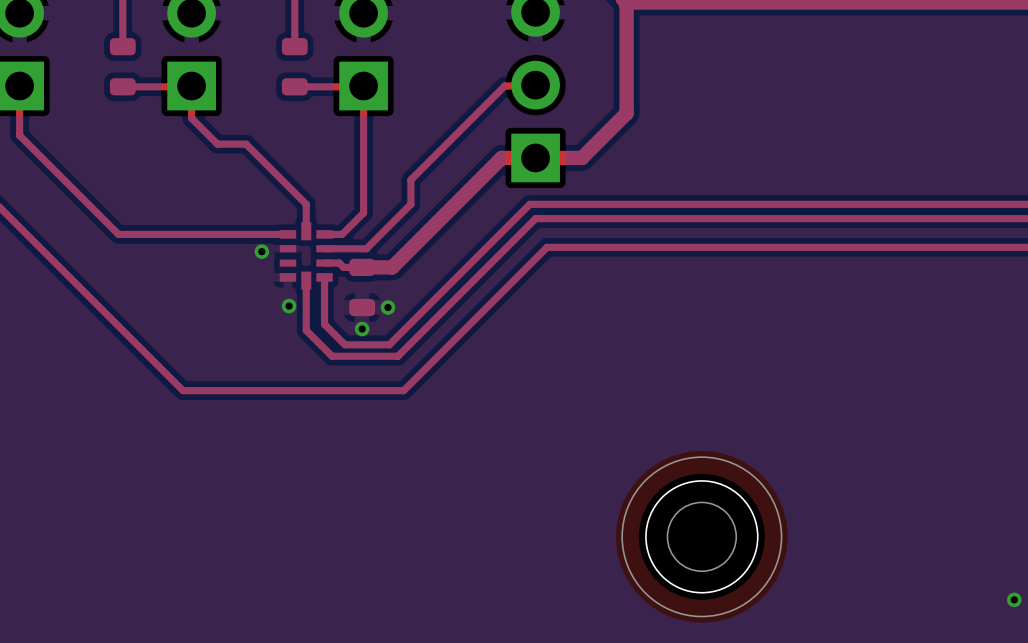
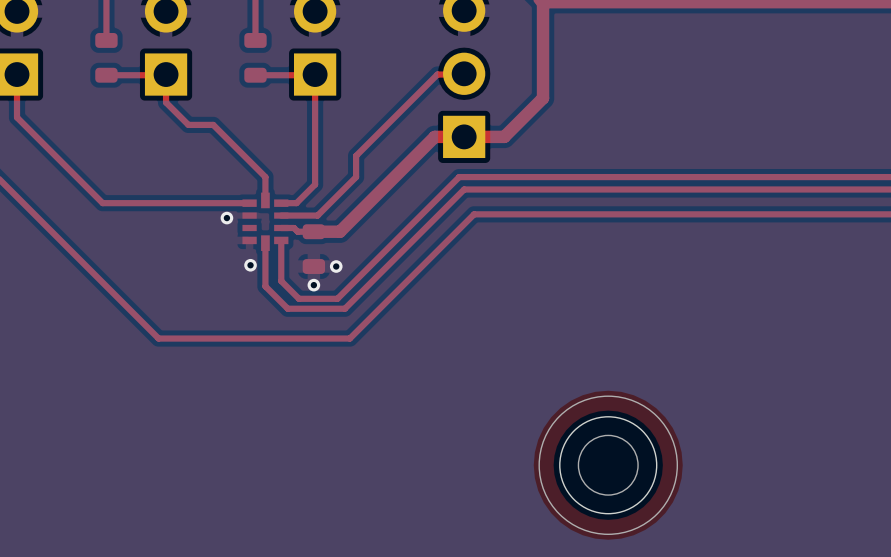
via: (1014, 599) -> none

